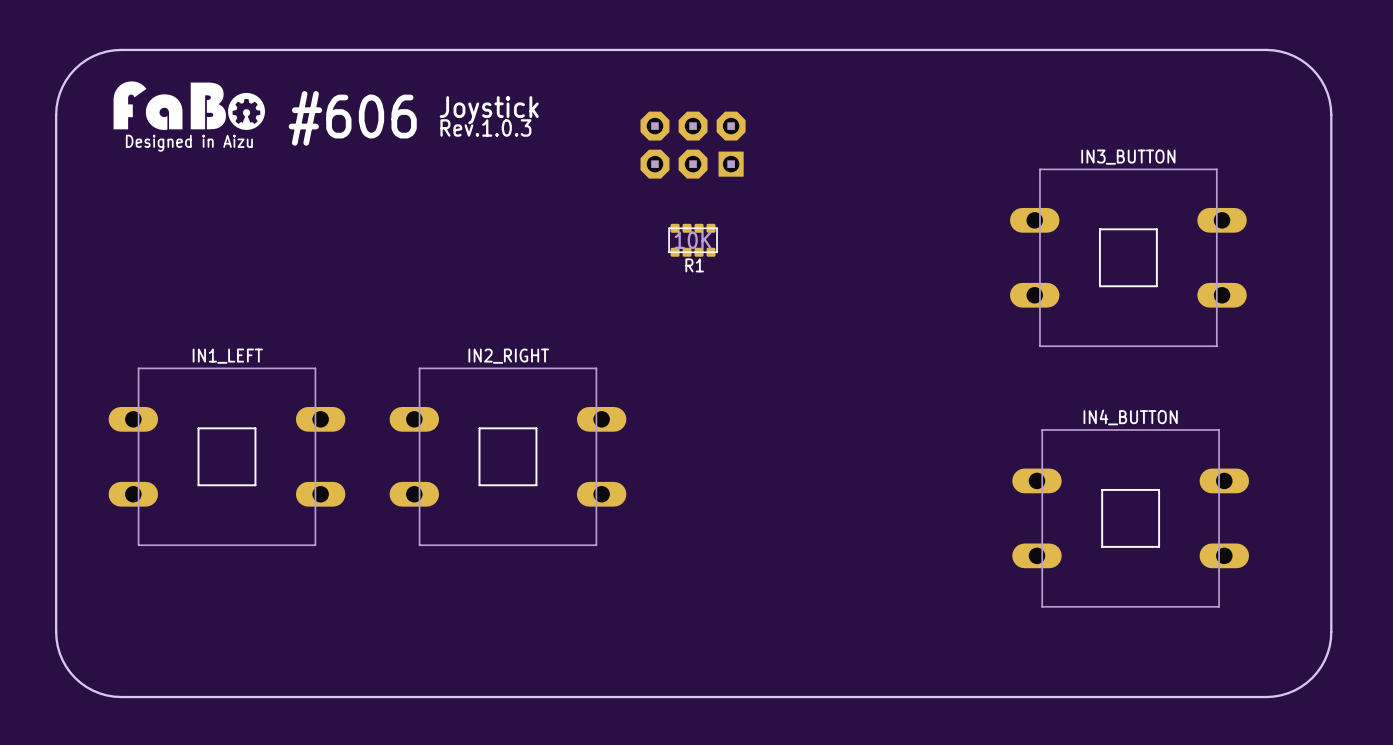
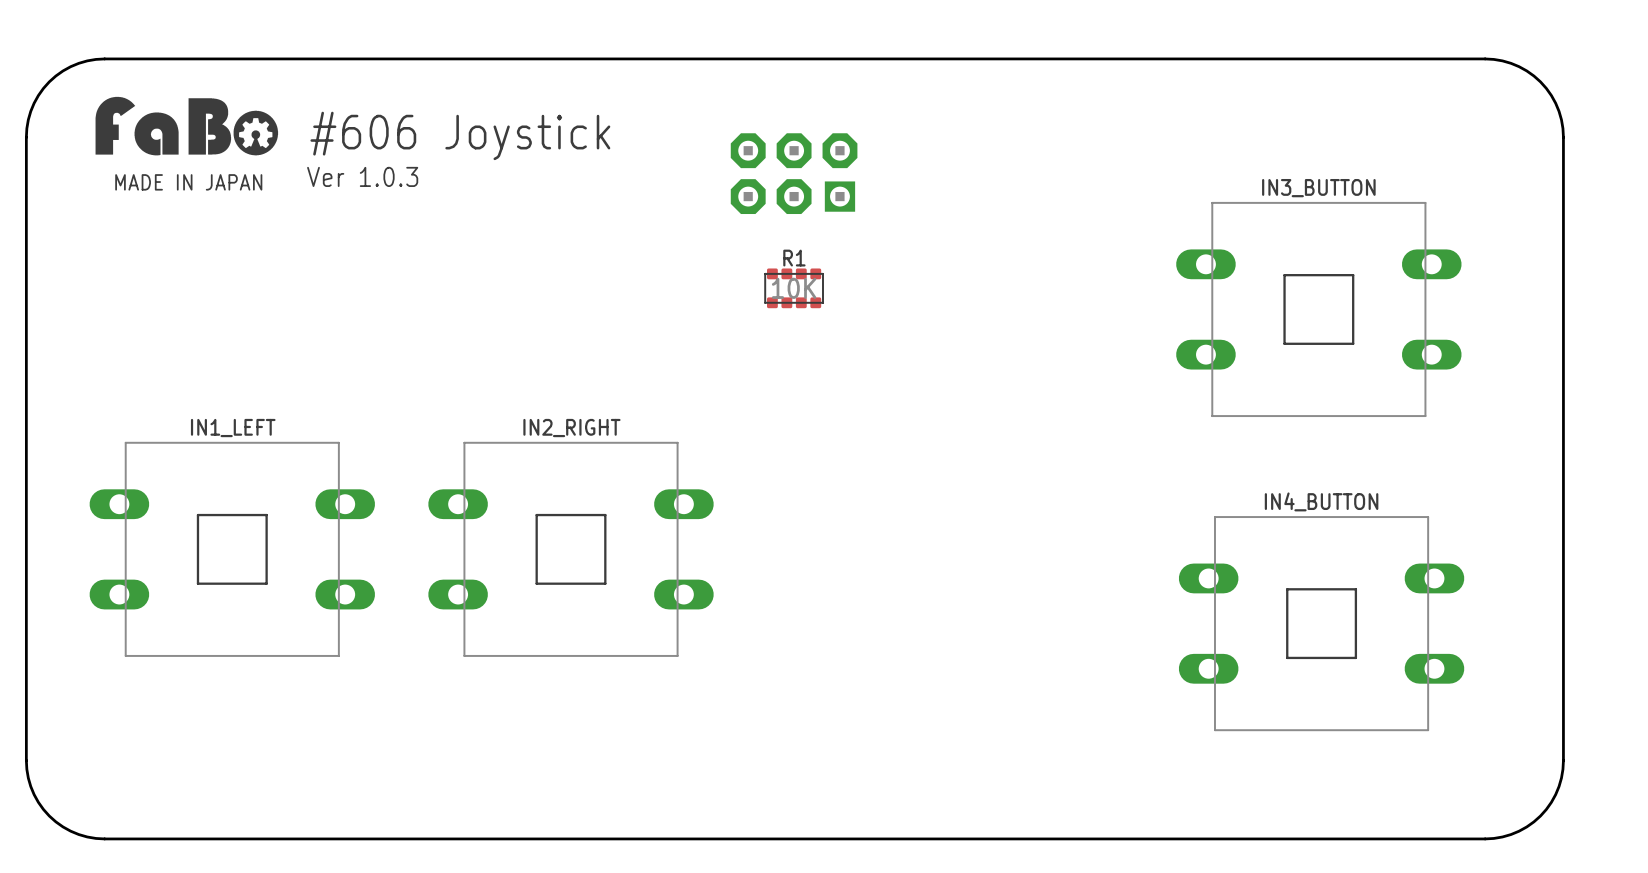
text: Joystick (489, 110) -> #606 Joystick (460, 135)
text: #606 (352, 118) -> none
text: Rev.1.0.3 (485, 127) -> none
text: Designed in Aizu (189, 143) -> none
text: none -> Ver 1.0.3 (362, 176)
text: none -> MADE IN JAPAN (188, 182)
R1 name position: R1 (694, 265) -> R1 (794, 258)

